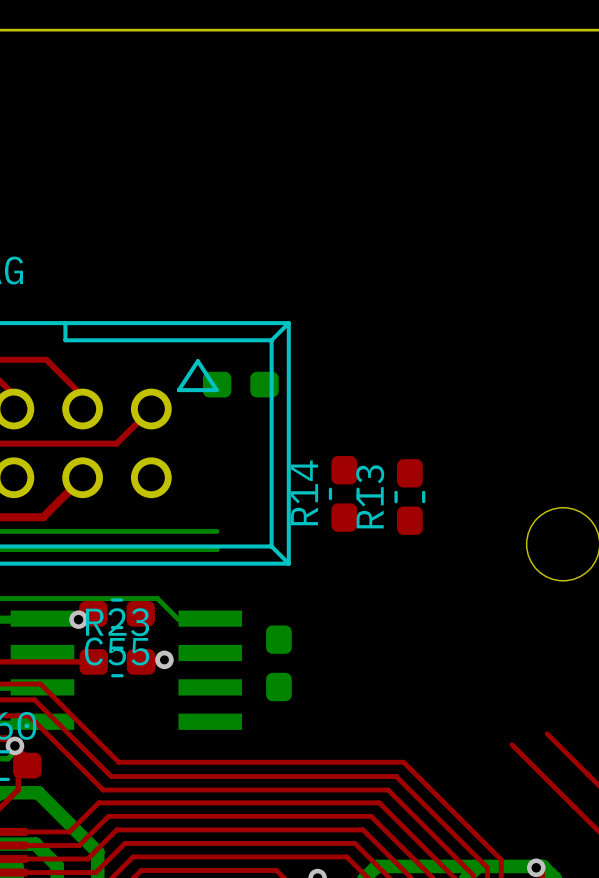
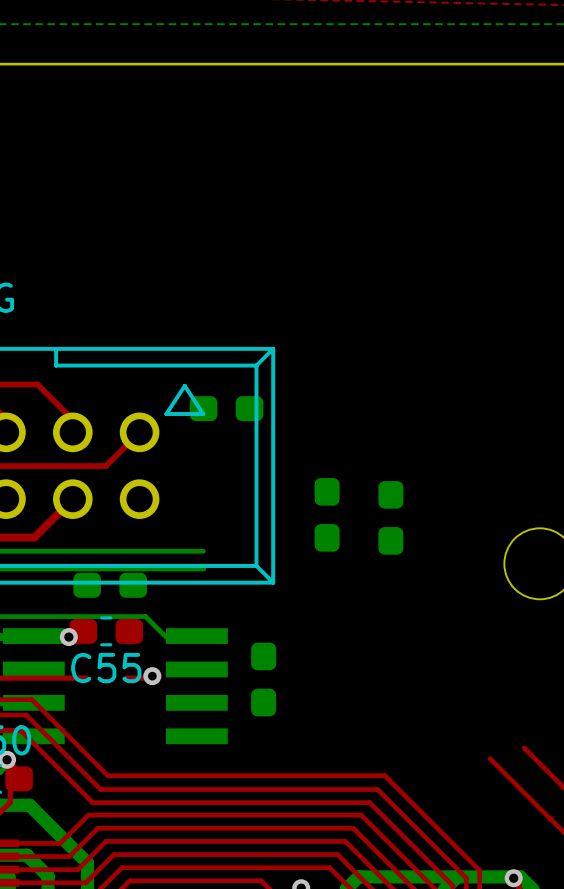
R14 side: top (344, 493) -> bottom (327, 514)
R13 side: top (409, 496) -> bottom (390, 517)
R23 side: top (117, 661) -> bottom (110, 585)

